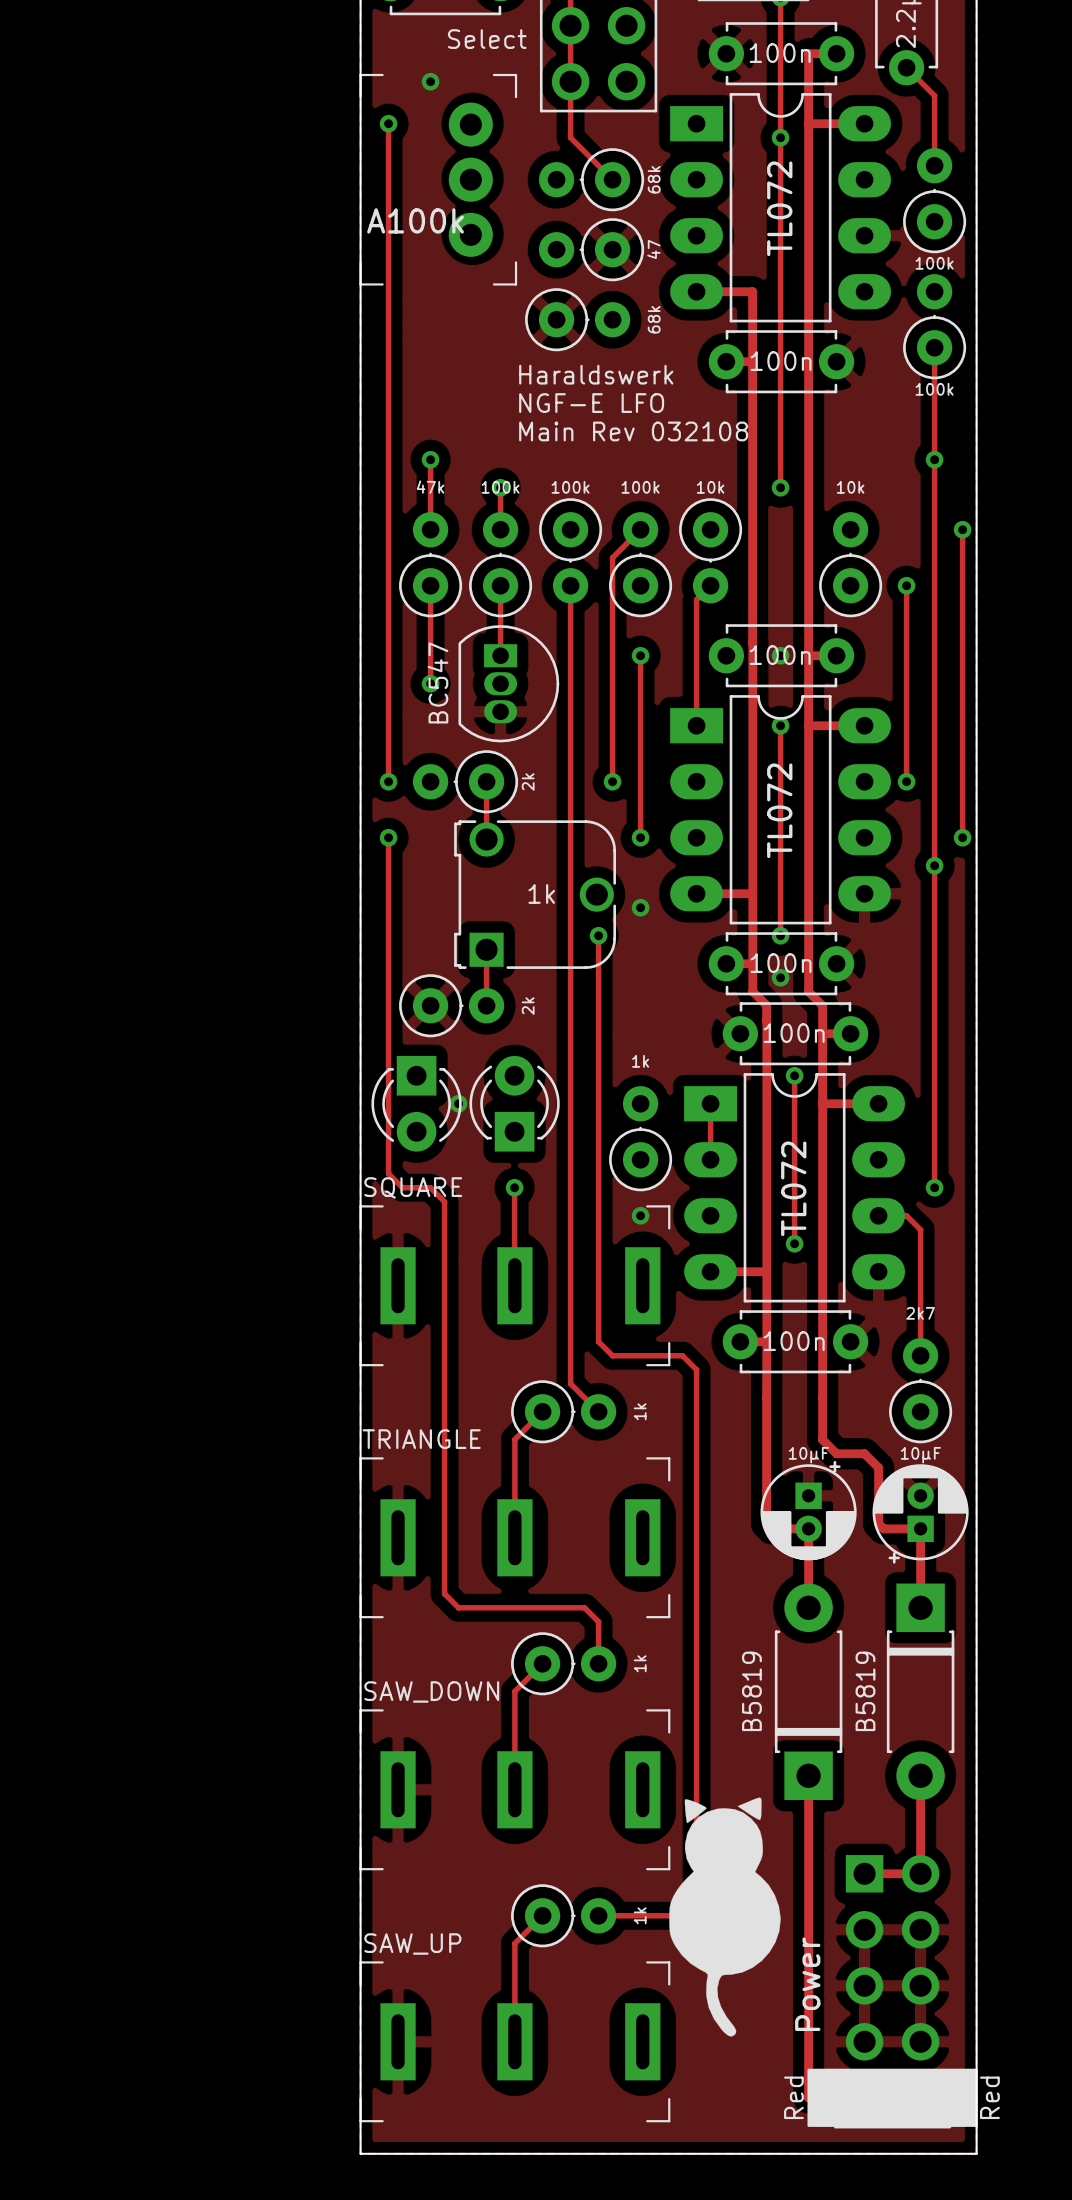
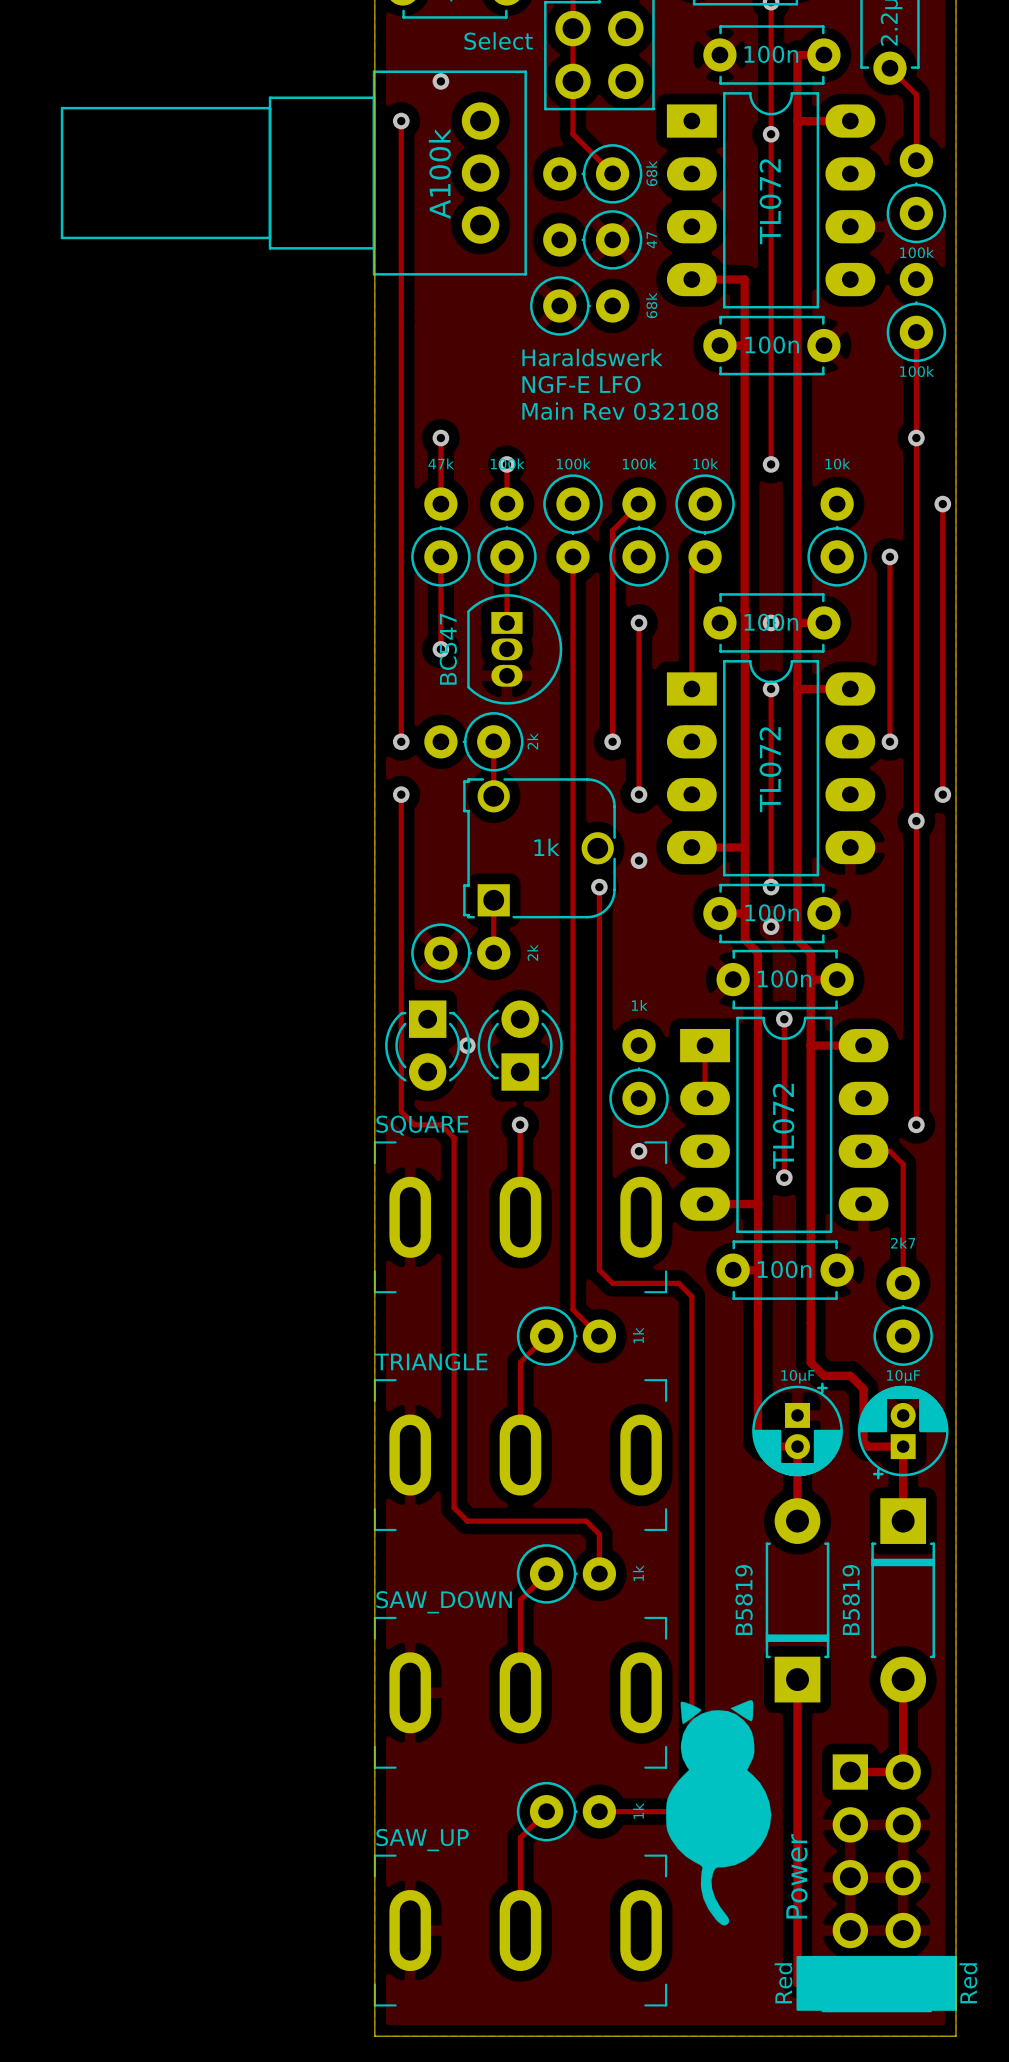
part: none -> A100k (293, 173)
part: A100k (438, 179) -> none
part footprint: [359, 1205, 671, 1367] -> [373, 1141, 668, 1294]
part footprint: [359, 1457, 671, 1619] -> [373, 1379, 668, 1531]
part footprint: [359, 1709, 671, 1871] -> [373, 1616, 668, 1769]
part footprint: [359, 1961, 671, 2123] -> [373, 1854, 668, 2007]

